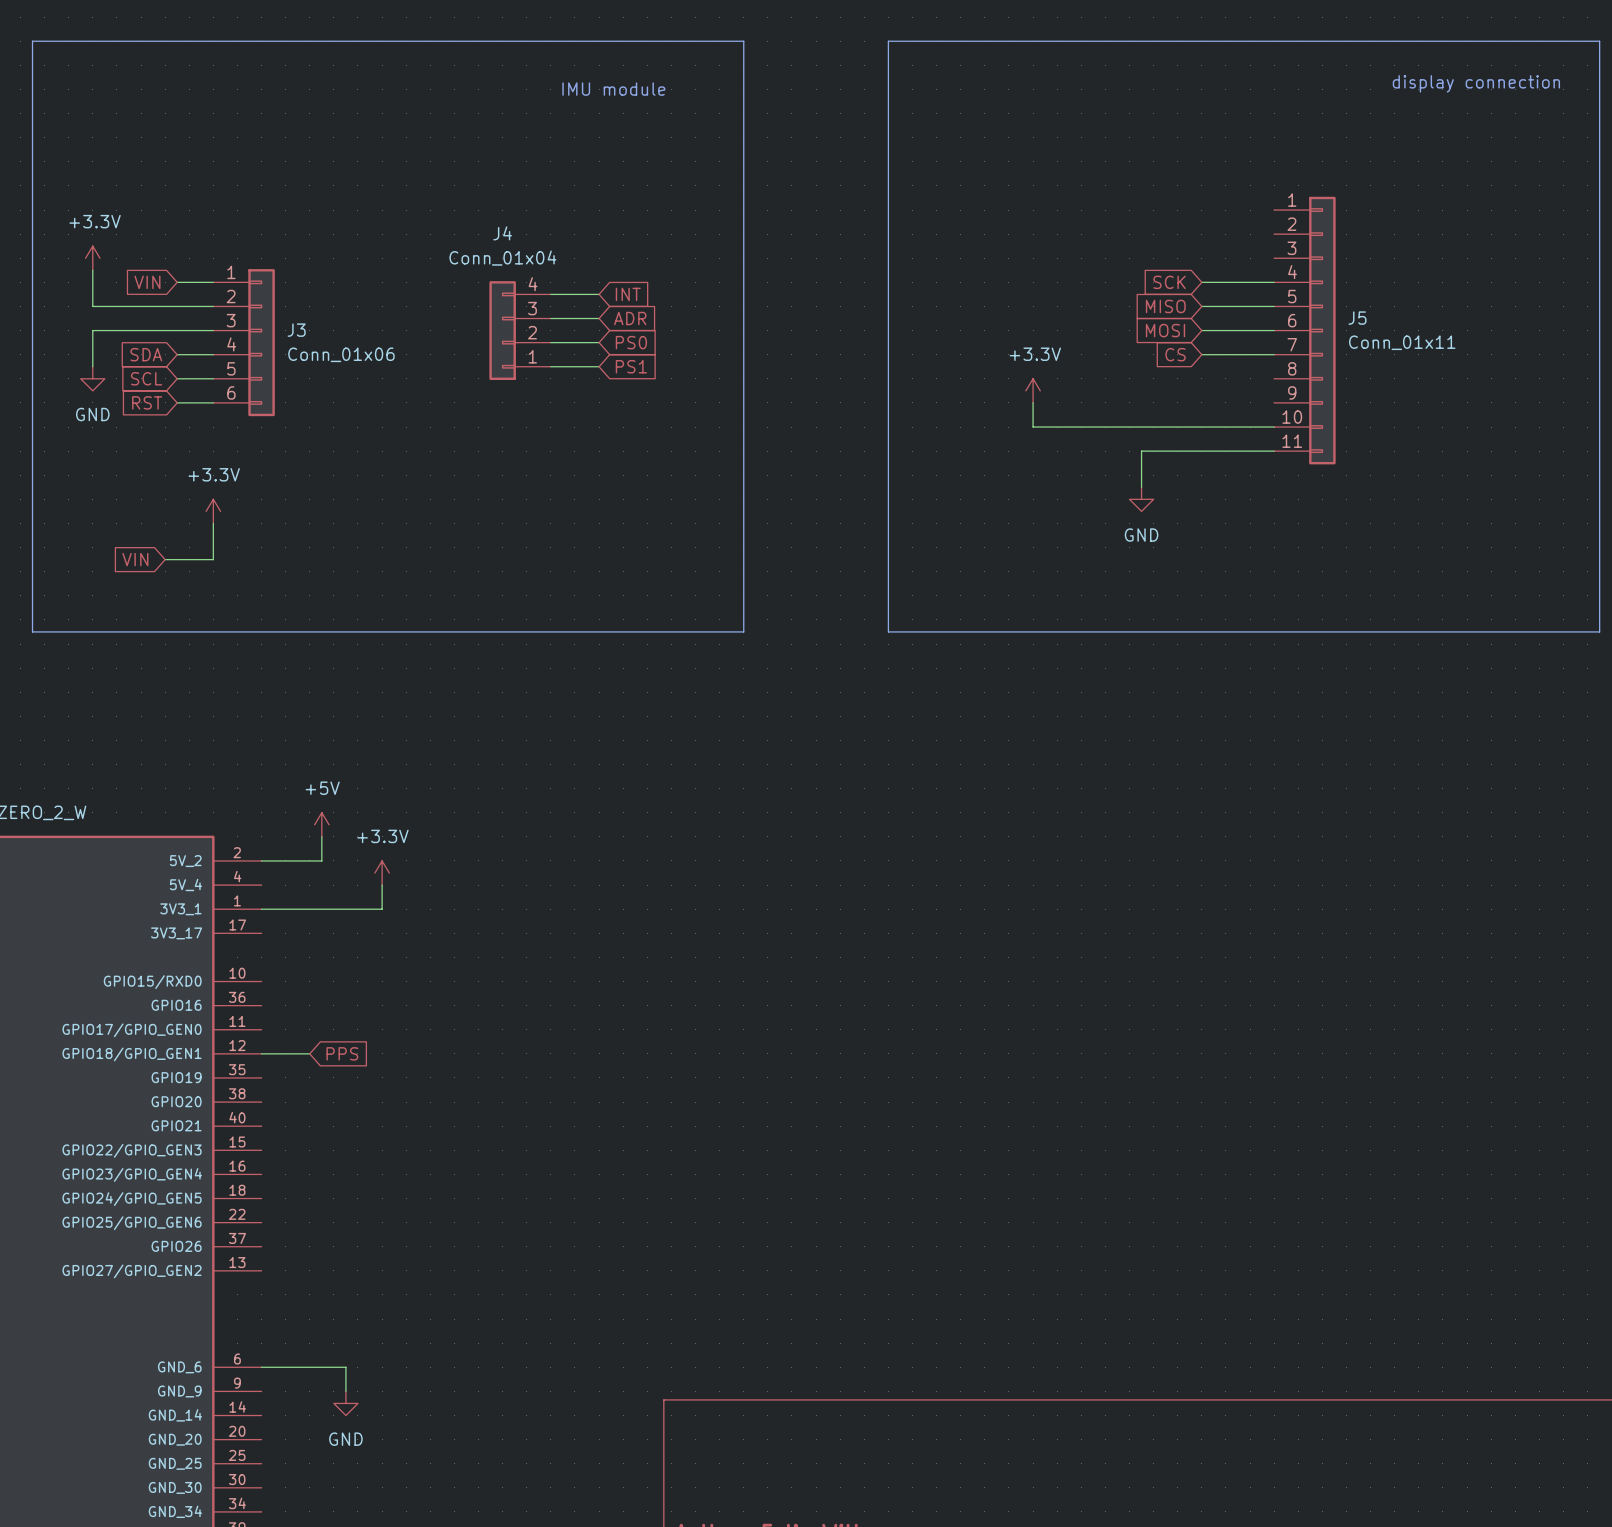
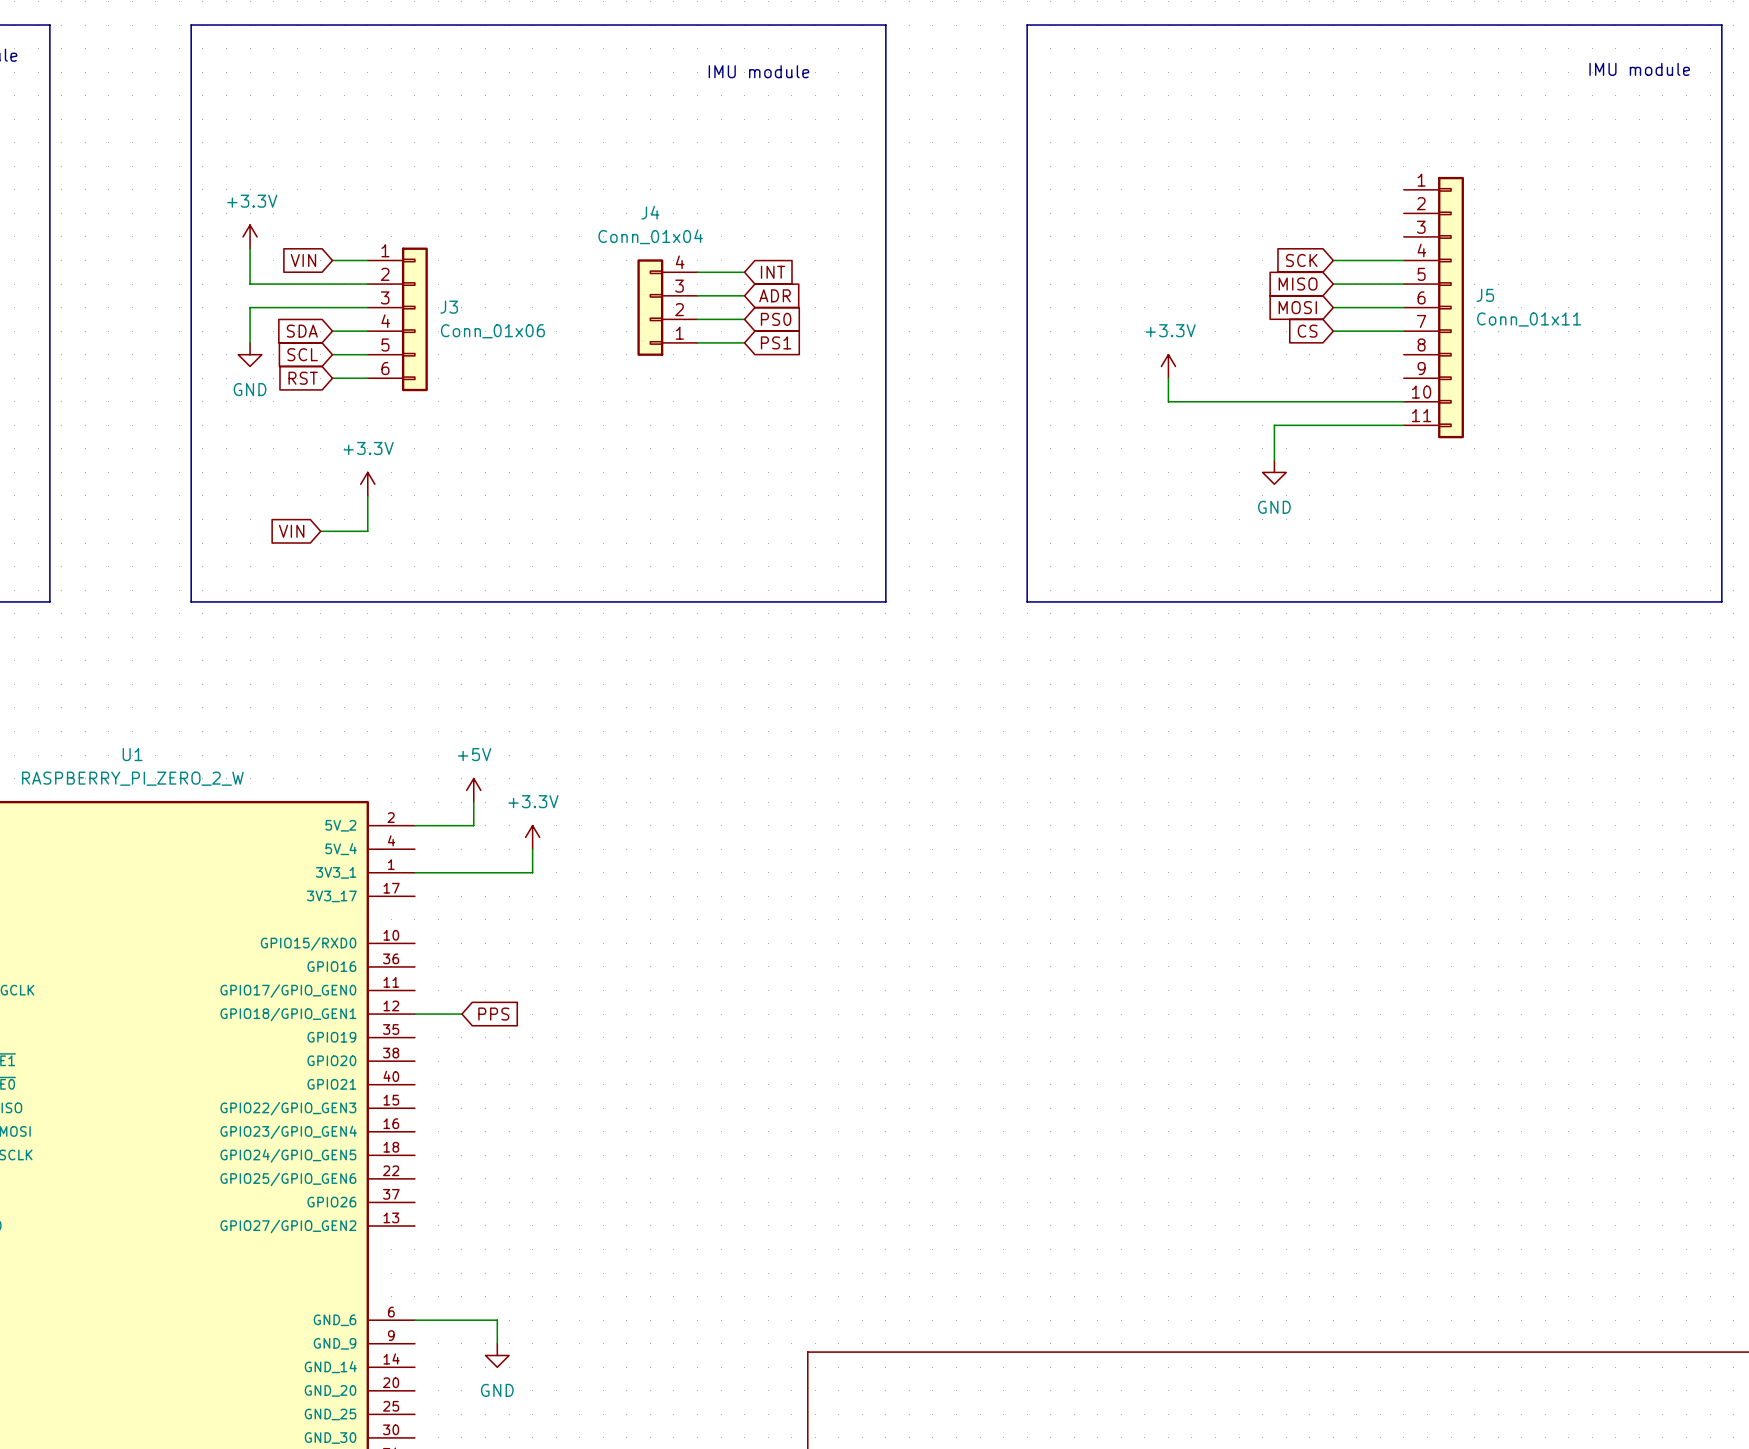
text: display connection (1476, 83) -> none
text: none -> IMU module (1639, 69)

